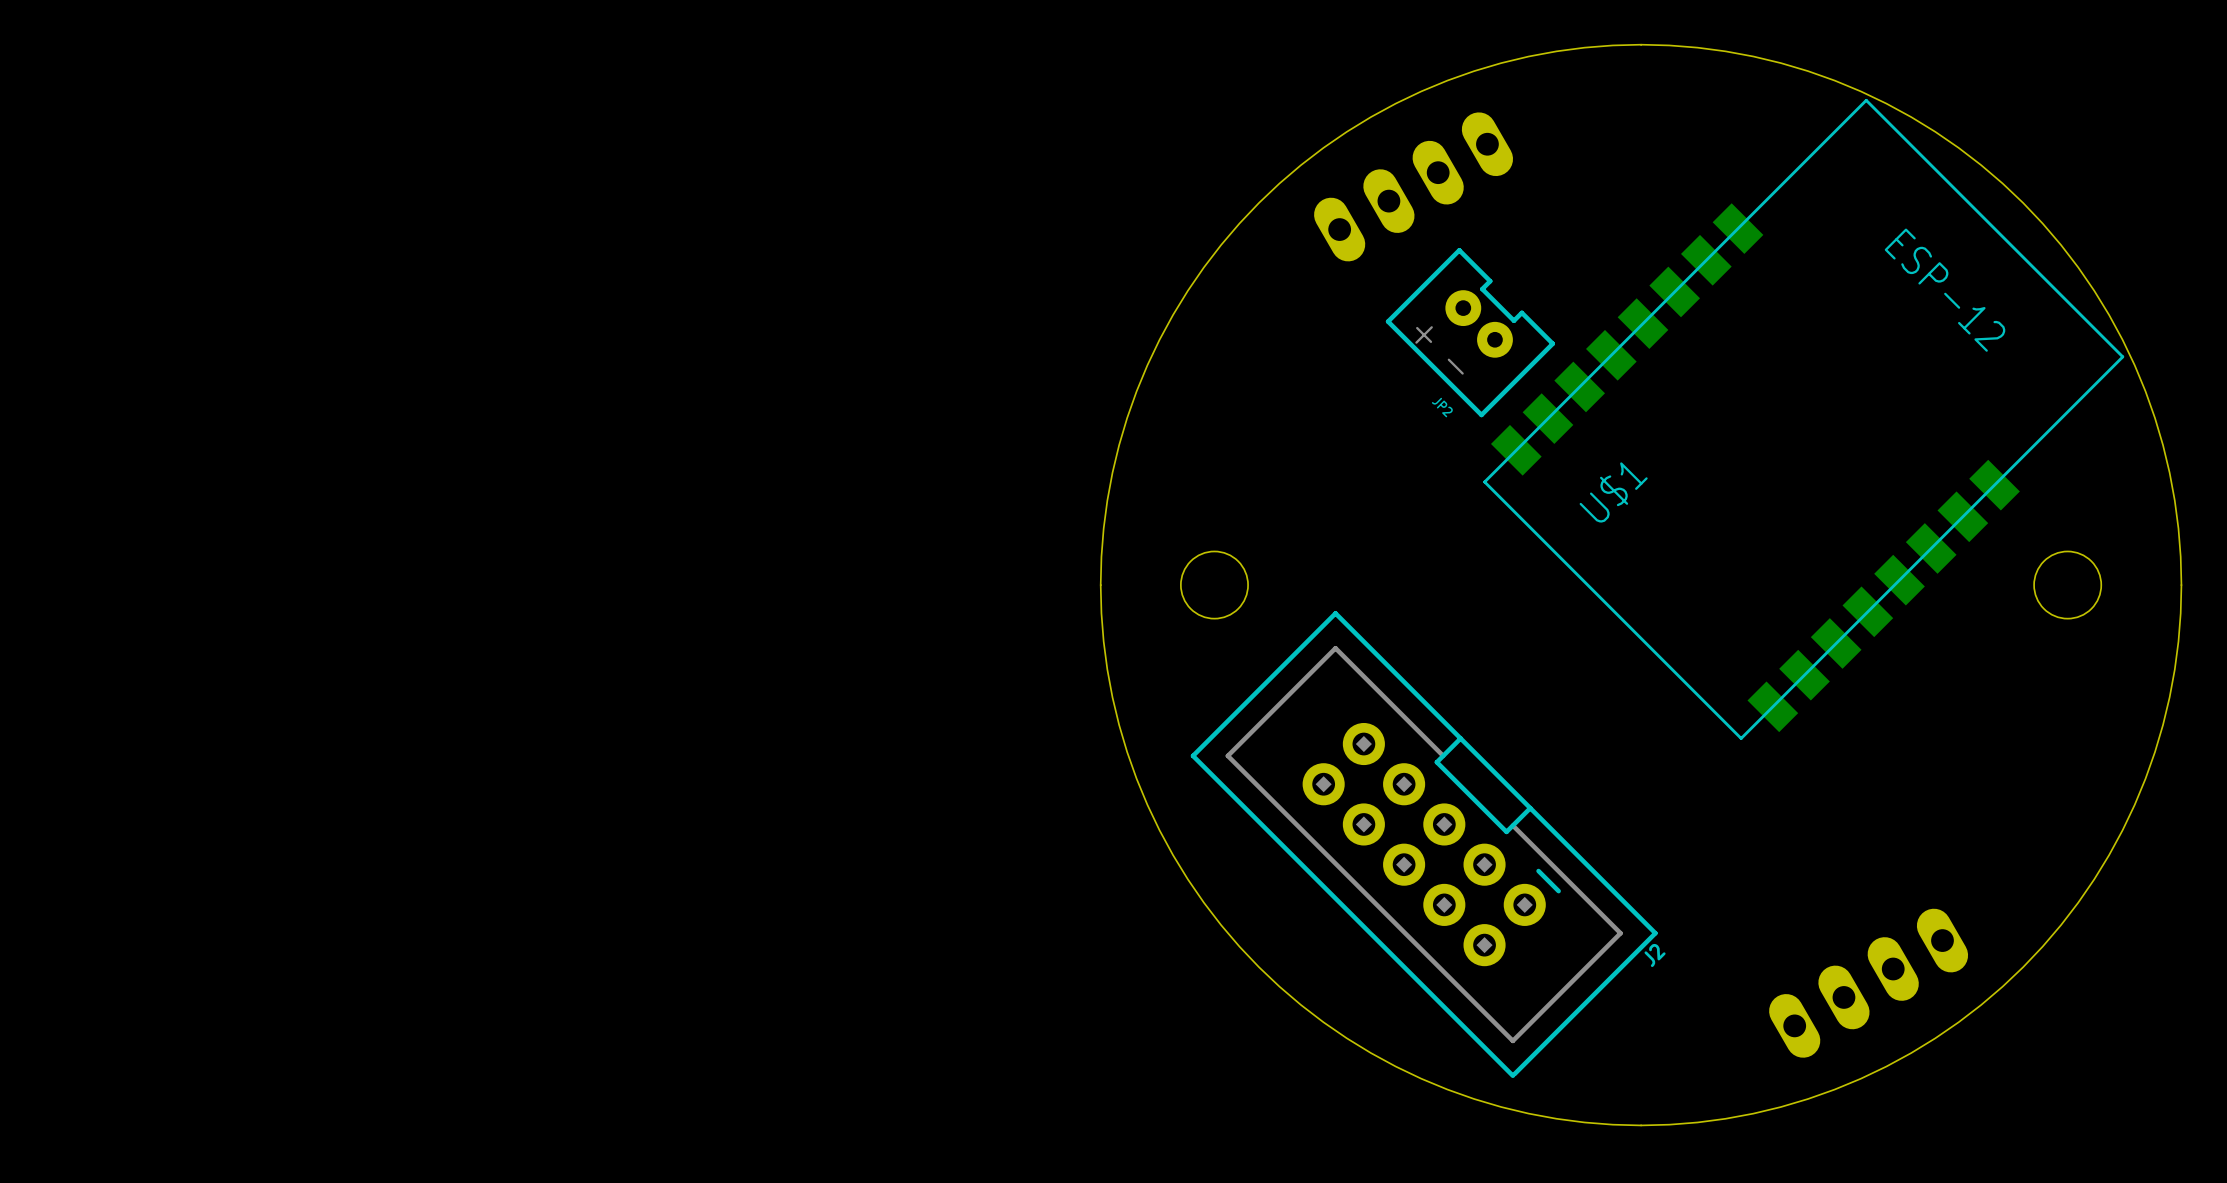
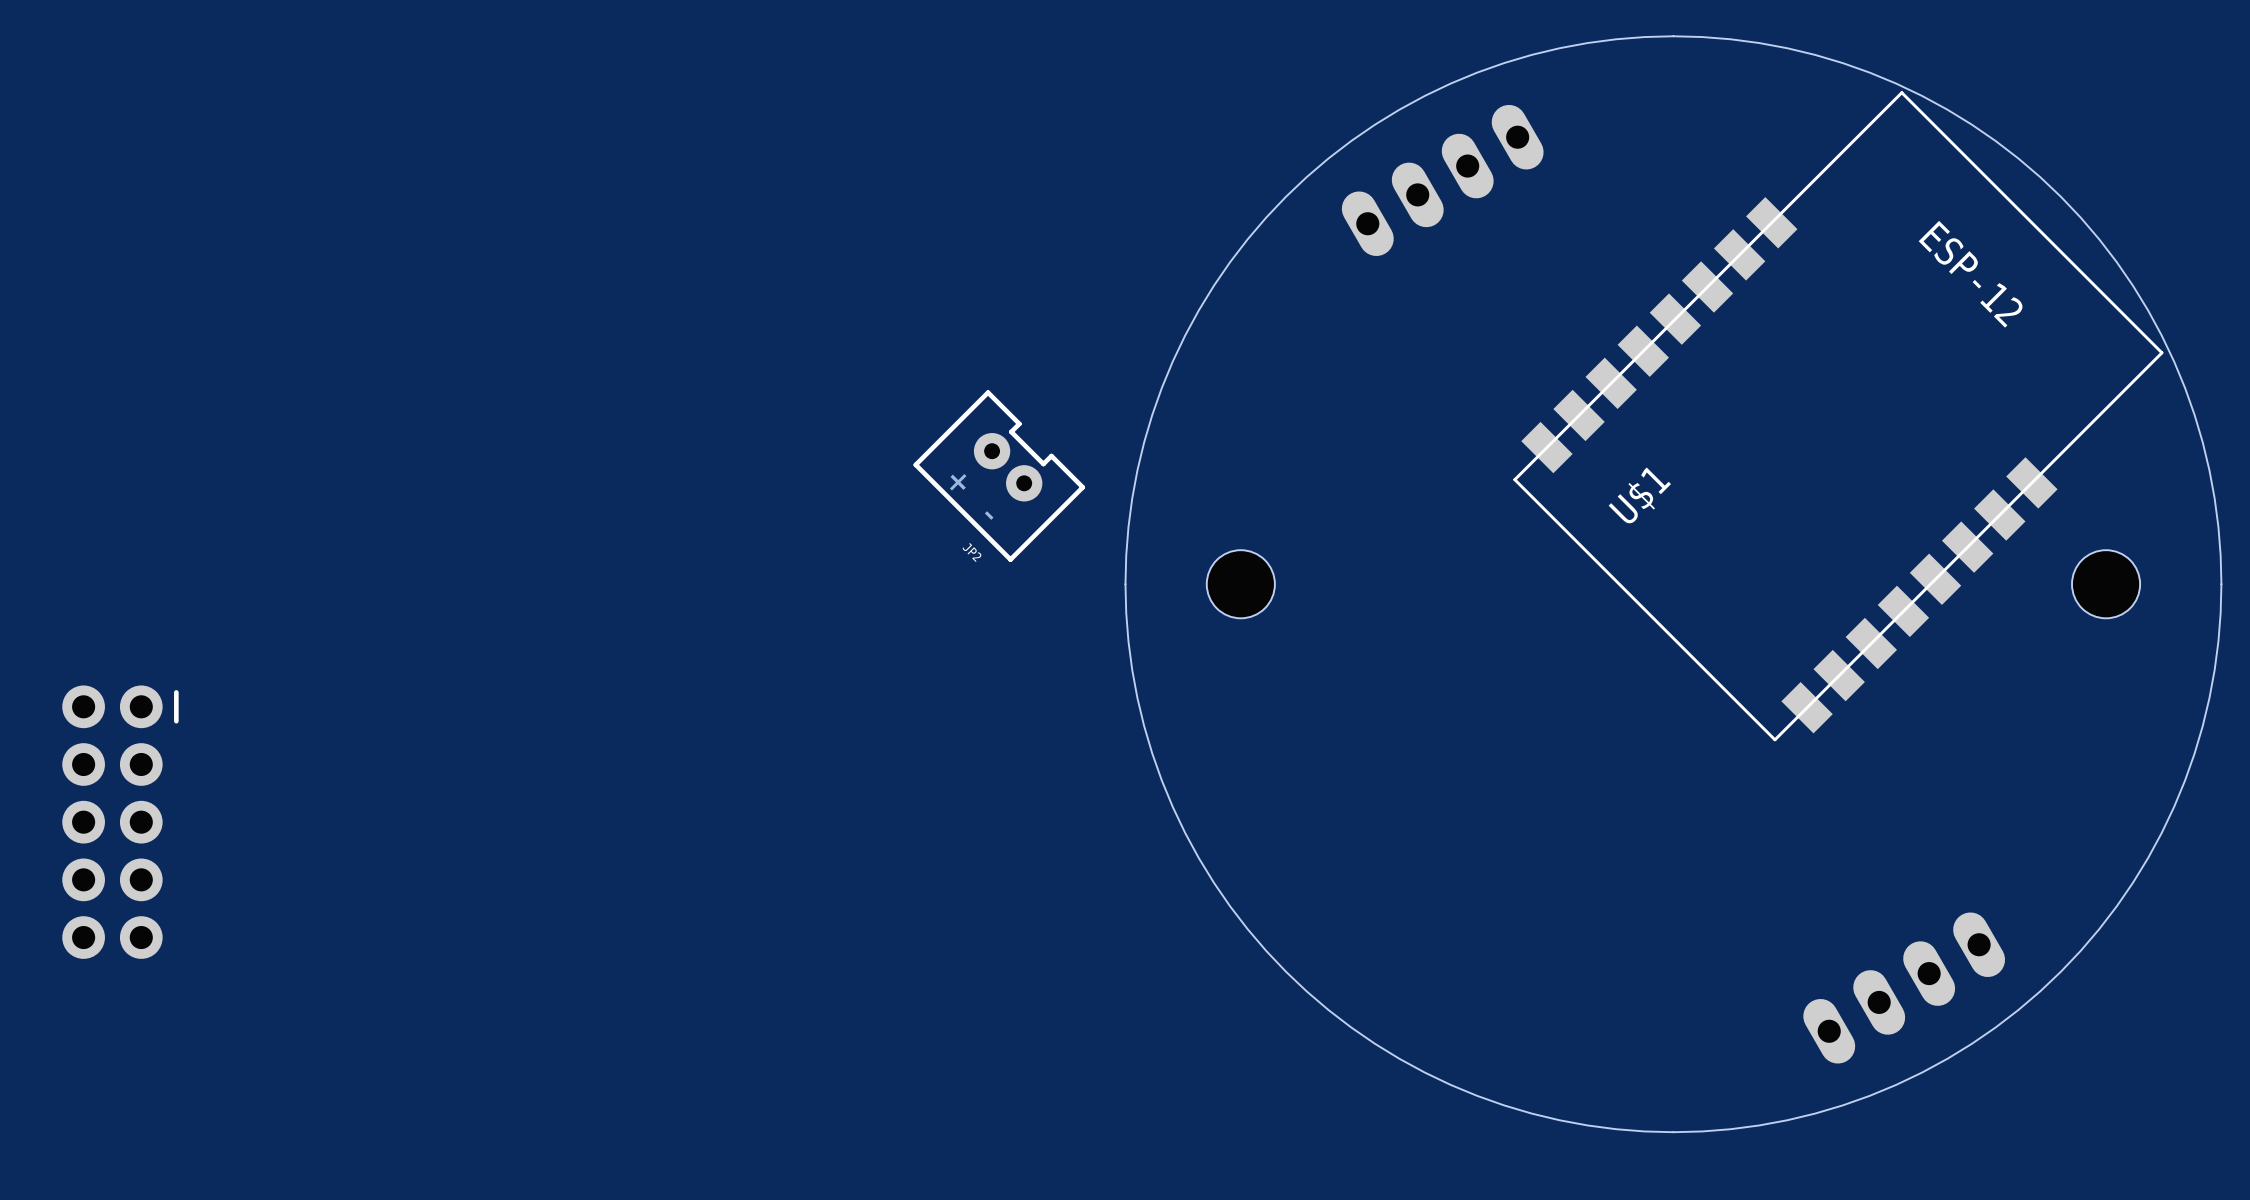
JP2 position: (1470, 332) -> (999, 476)
part: none -> (120, 822)
J2: (1424, 844) -> none

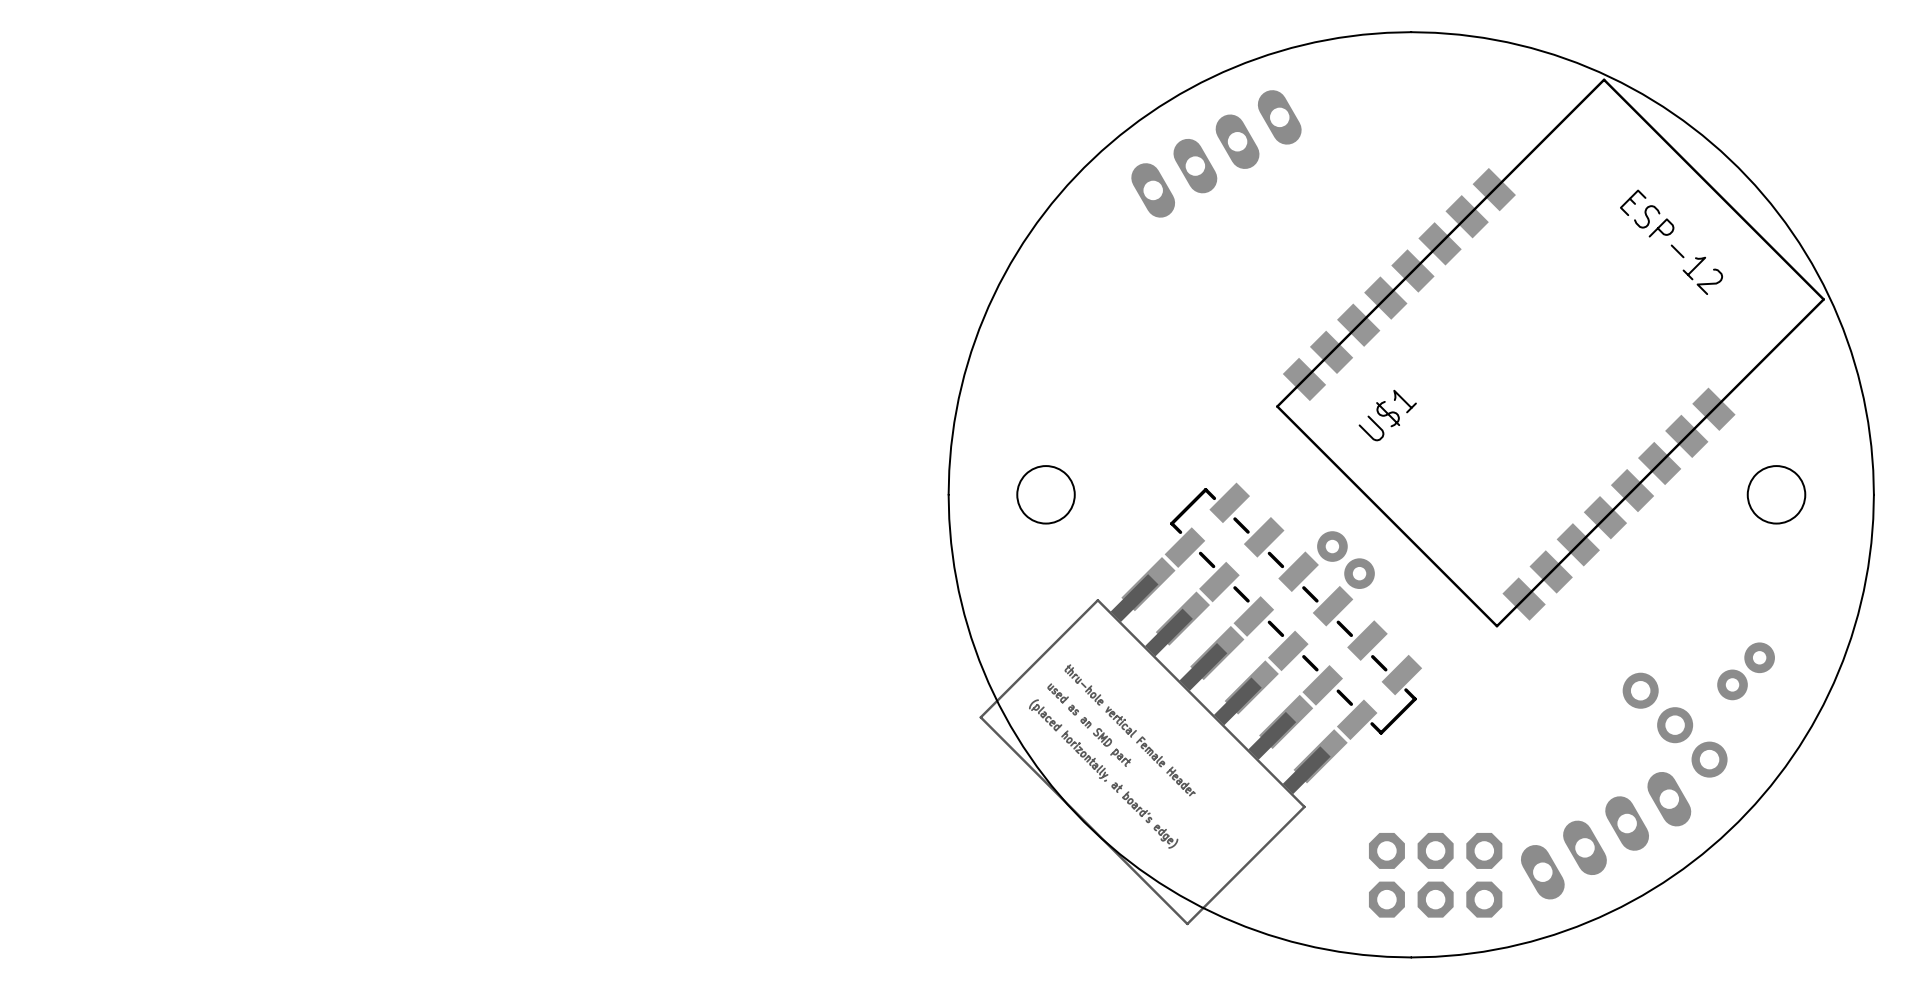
JP2: (999, 476) -> none
part: none -> (1345, 560)
part: none -> (1293, 611)
part: none -> (1746, 671)
part: (120, 822) -> none
part: none -> (1675, 725)
part: none -> (1163, 741)
part: none -> (1435, 875)

